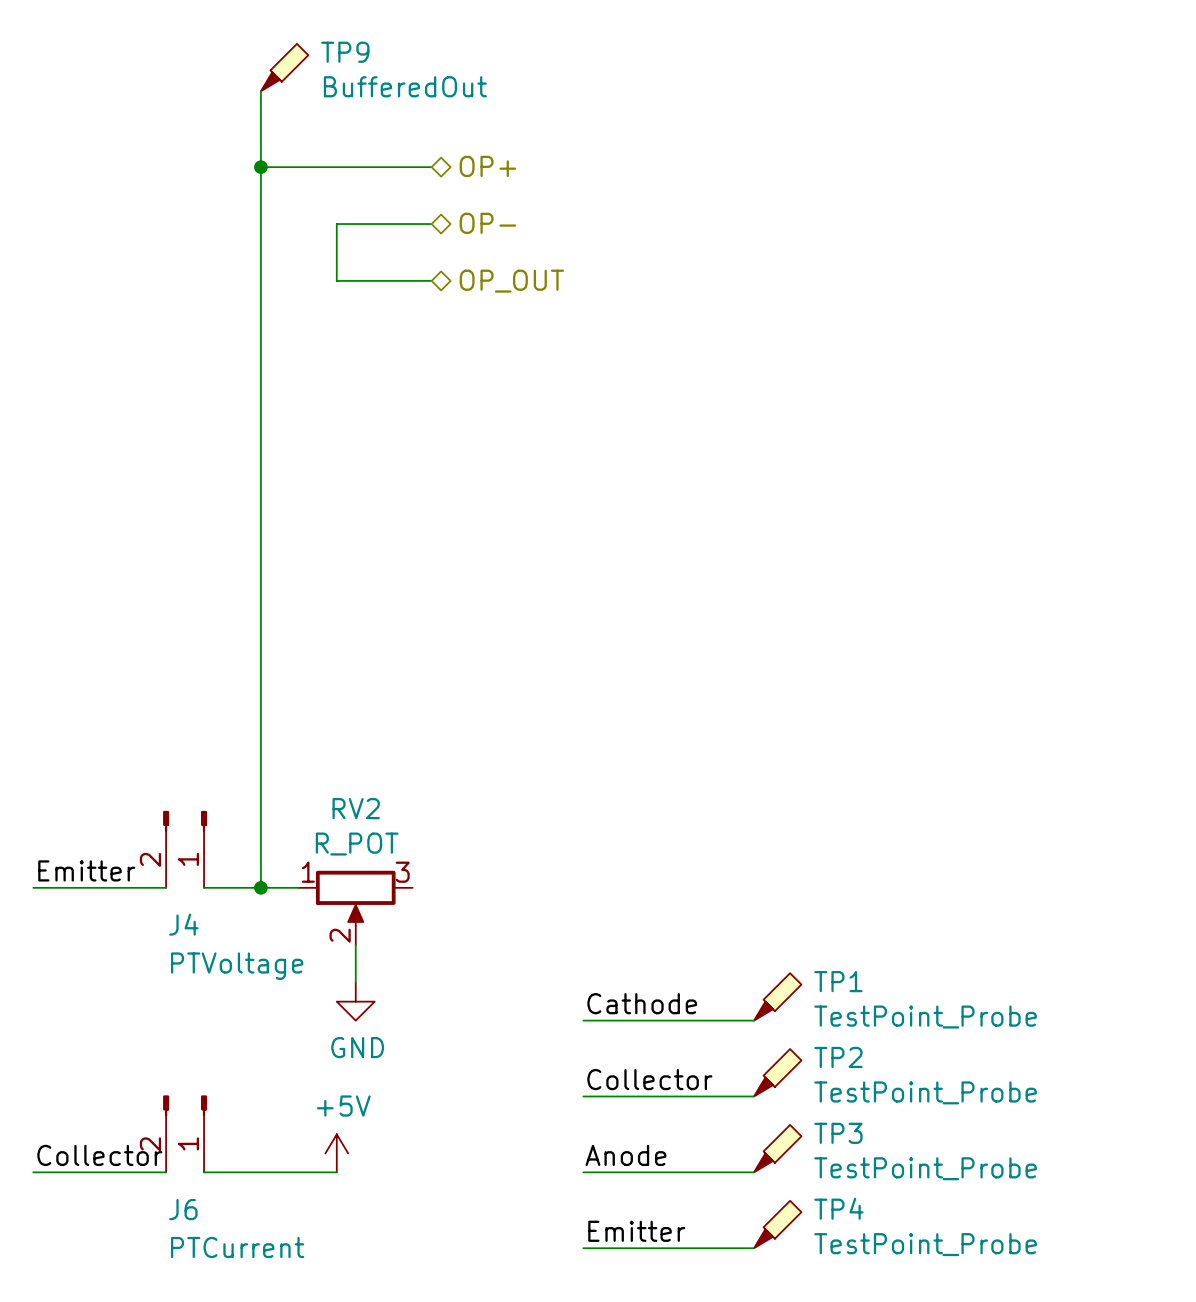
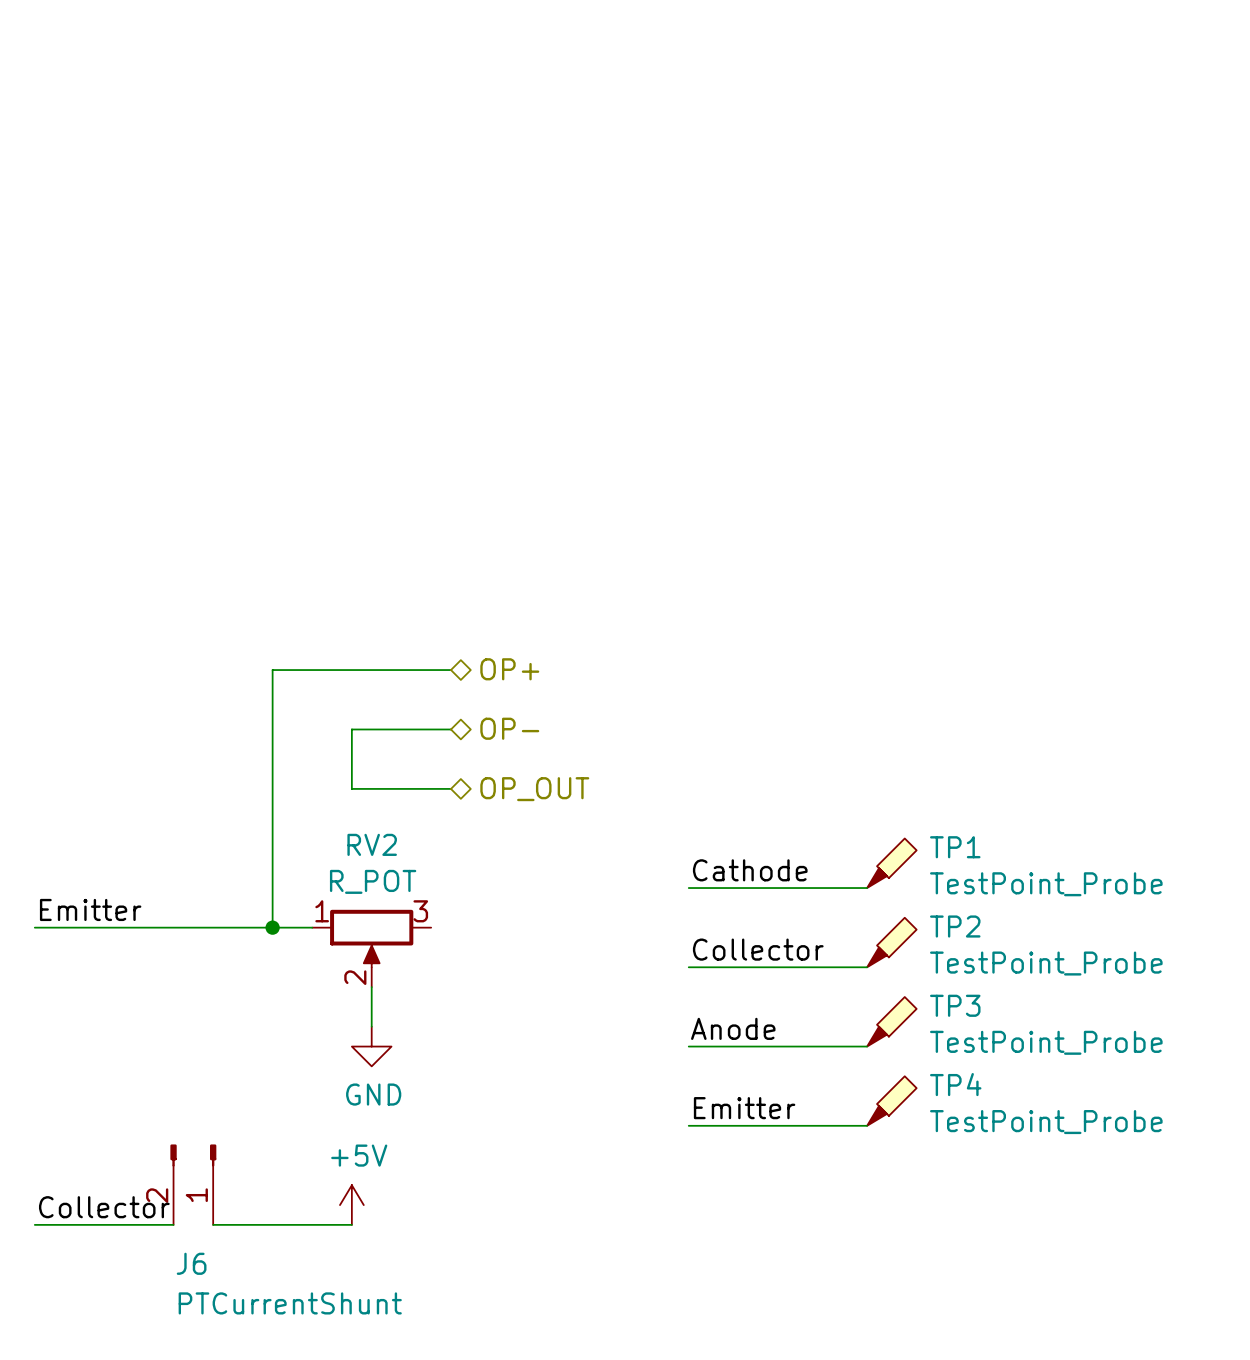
TP9: BufferedOut (284, 67) -> none
wire: (260, 91) (260, 641) -> (450, 670) (272, 670)
hierarchical label: OP+ (487, 166) -> none
wire: (260, 167) (431, 167) -> none
junction: (260, 167) -> none
hierarchical label: OP- (487, 223) -> none
wire: (431, 224) (336, 224) (336, 280) (431, 280) -> none
hierarchical label: OP_OUT (511, 281) -> none
hierarchical label: none -> OP+ (509, 669)
hierarchical label: none -> OP- (509, 728)
wire: none -> (450, 729) (351, 729) (351, 788) (450, 788)
hierarchical label: none -> OP_OUT (534, 789)
J4: PTVoltage (185, 849) -> none
wire: none -> (173, 927) (213, 927)
TP1 position: (777, 996) -> (891, 863)
label position: Cathode (642, 1003) -> Cathode (750, 870)
wire: (583, 1020) (754, 1020) -> (688, 888) (867, 888)
TP2 position: (777, 1072) -> (891, 942)
label position: Collector (649, 1079) -> Collector (758, 949)
wire: (583, 1096) (754, 1096) -> (688, 967) (867, 967)
TP3 position: (777, 1148) -> (891, 1021)
label position: Anode (625, 1155) -> Anode (733, 1028)
wire: (583, 1172) (754, 1172) -> (688, 1046) (867, 1046)
TP4 position: (777, 1224) -> (891, 1101)
label position: Emitter (636, 1231) -> Emitter (744, 1108)
J6 value: PTCurrent (237, 1247) -> PTCurrentShunt (290, 1303)
wire: (583, 1248) (754, 1248) -> (688, 1125) (867, 1125)

